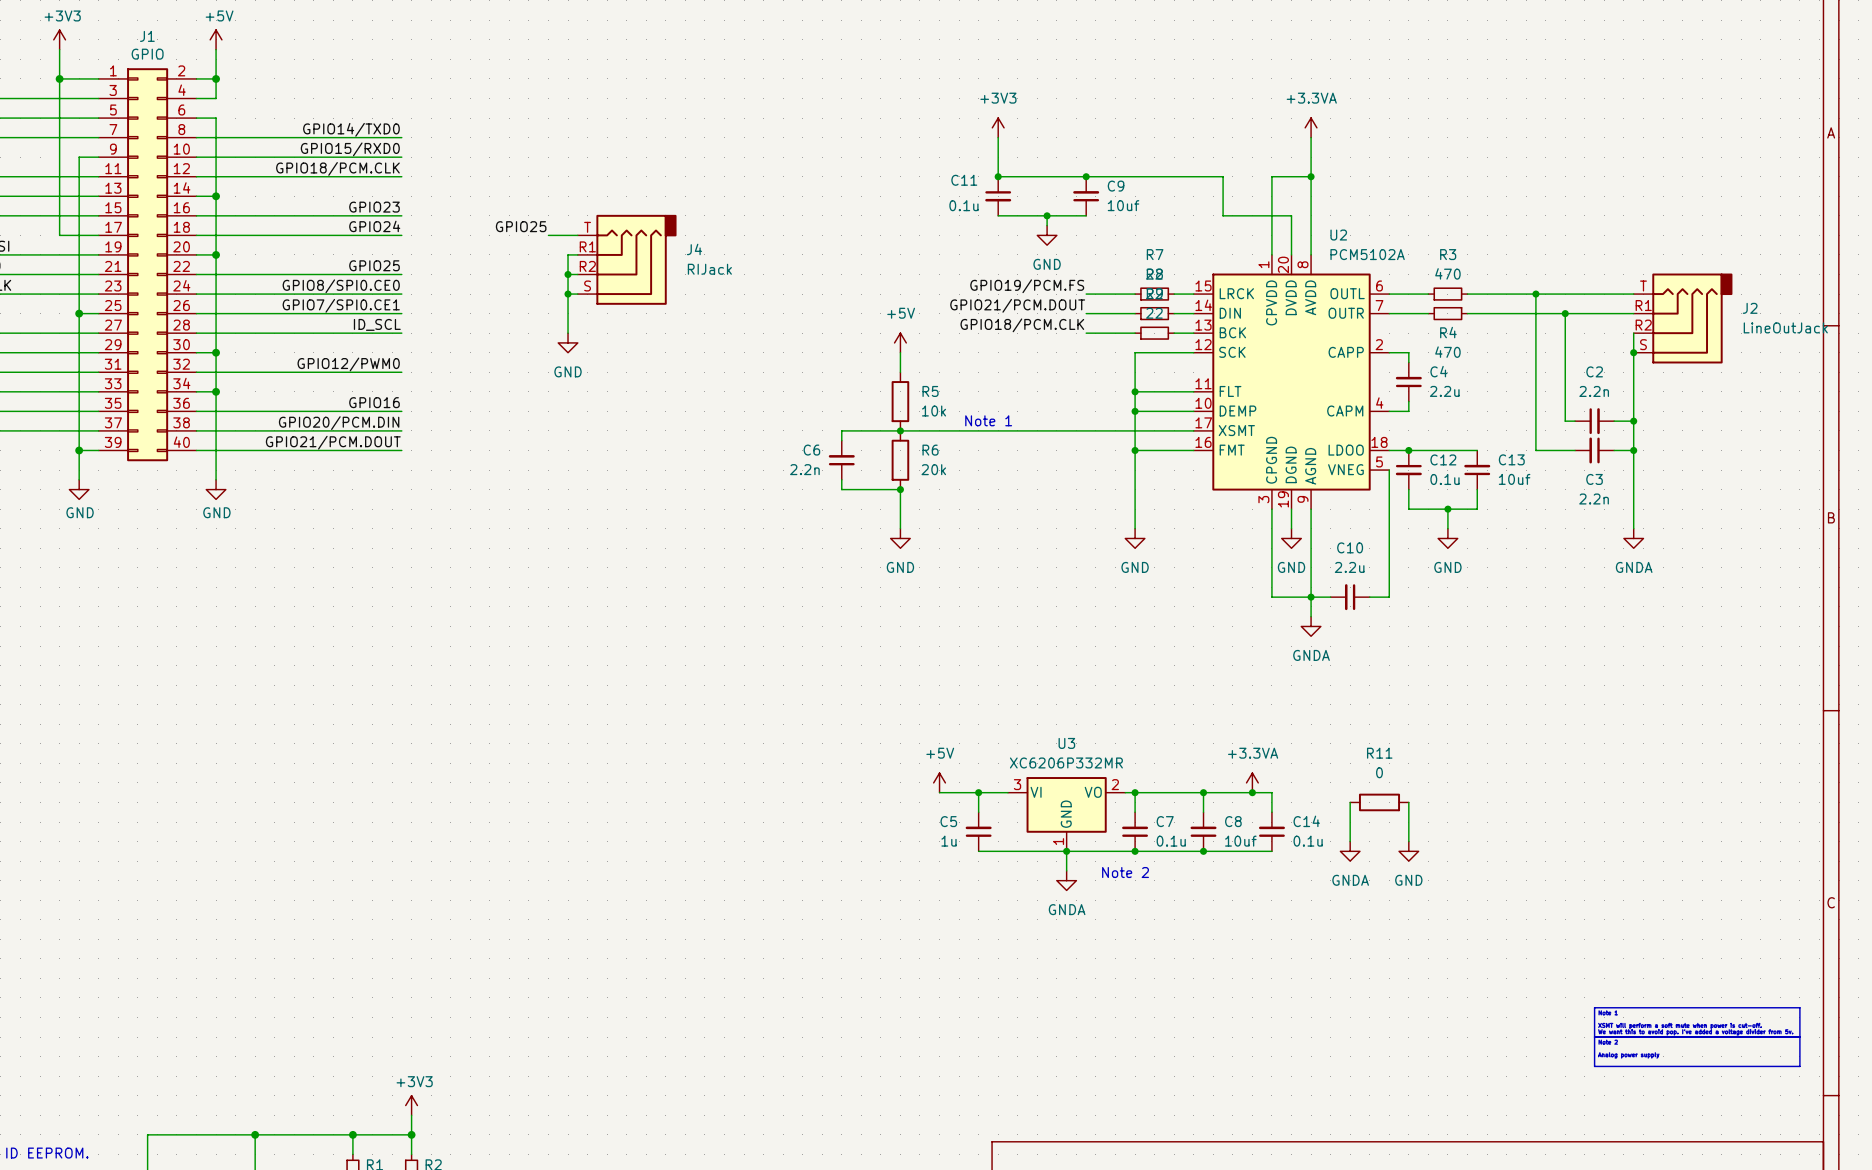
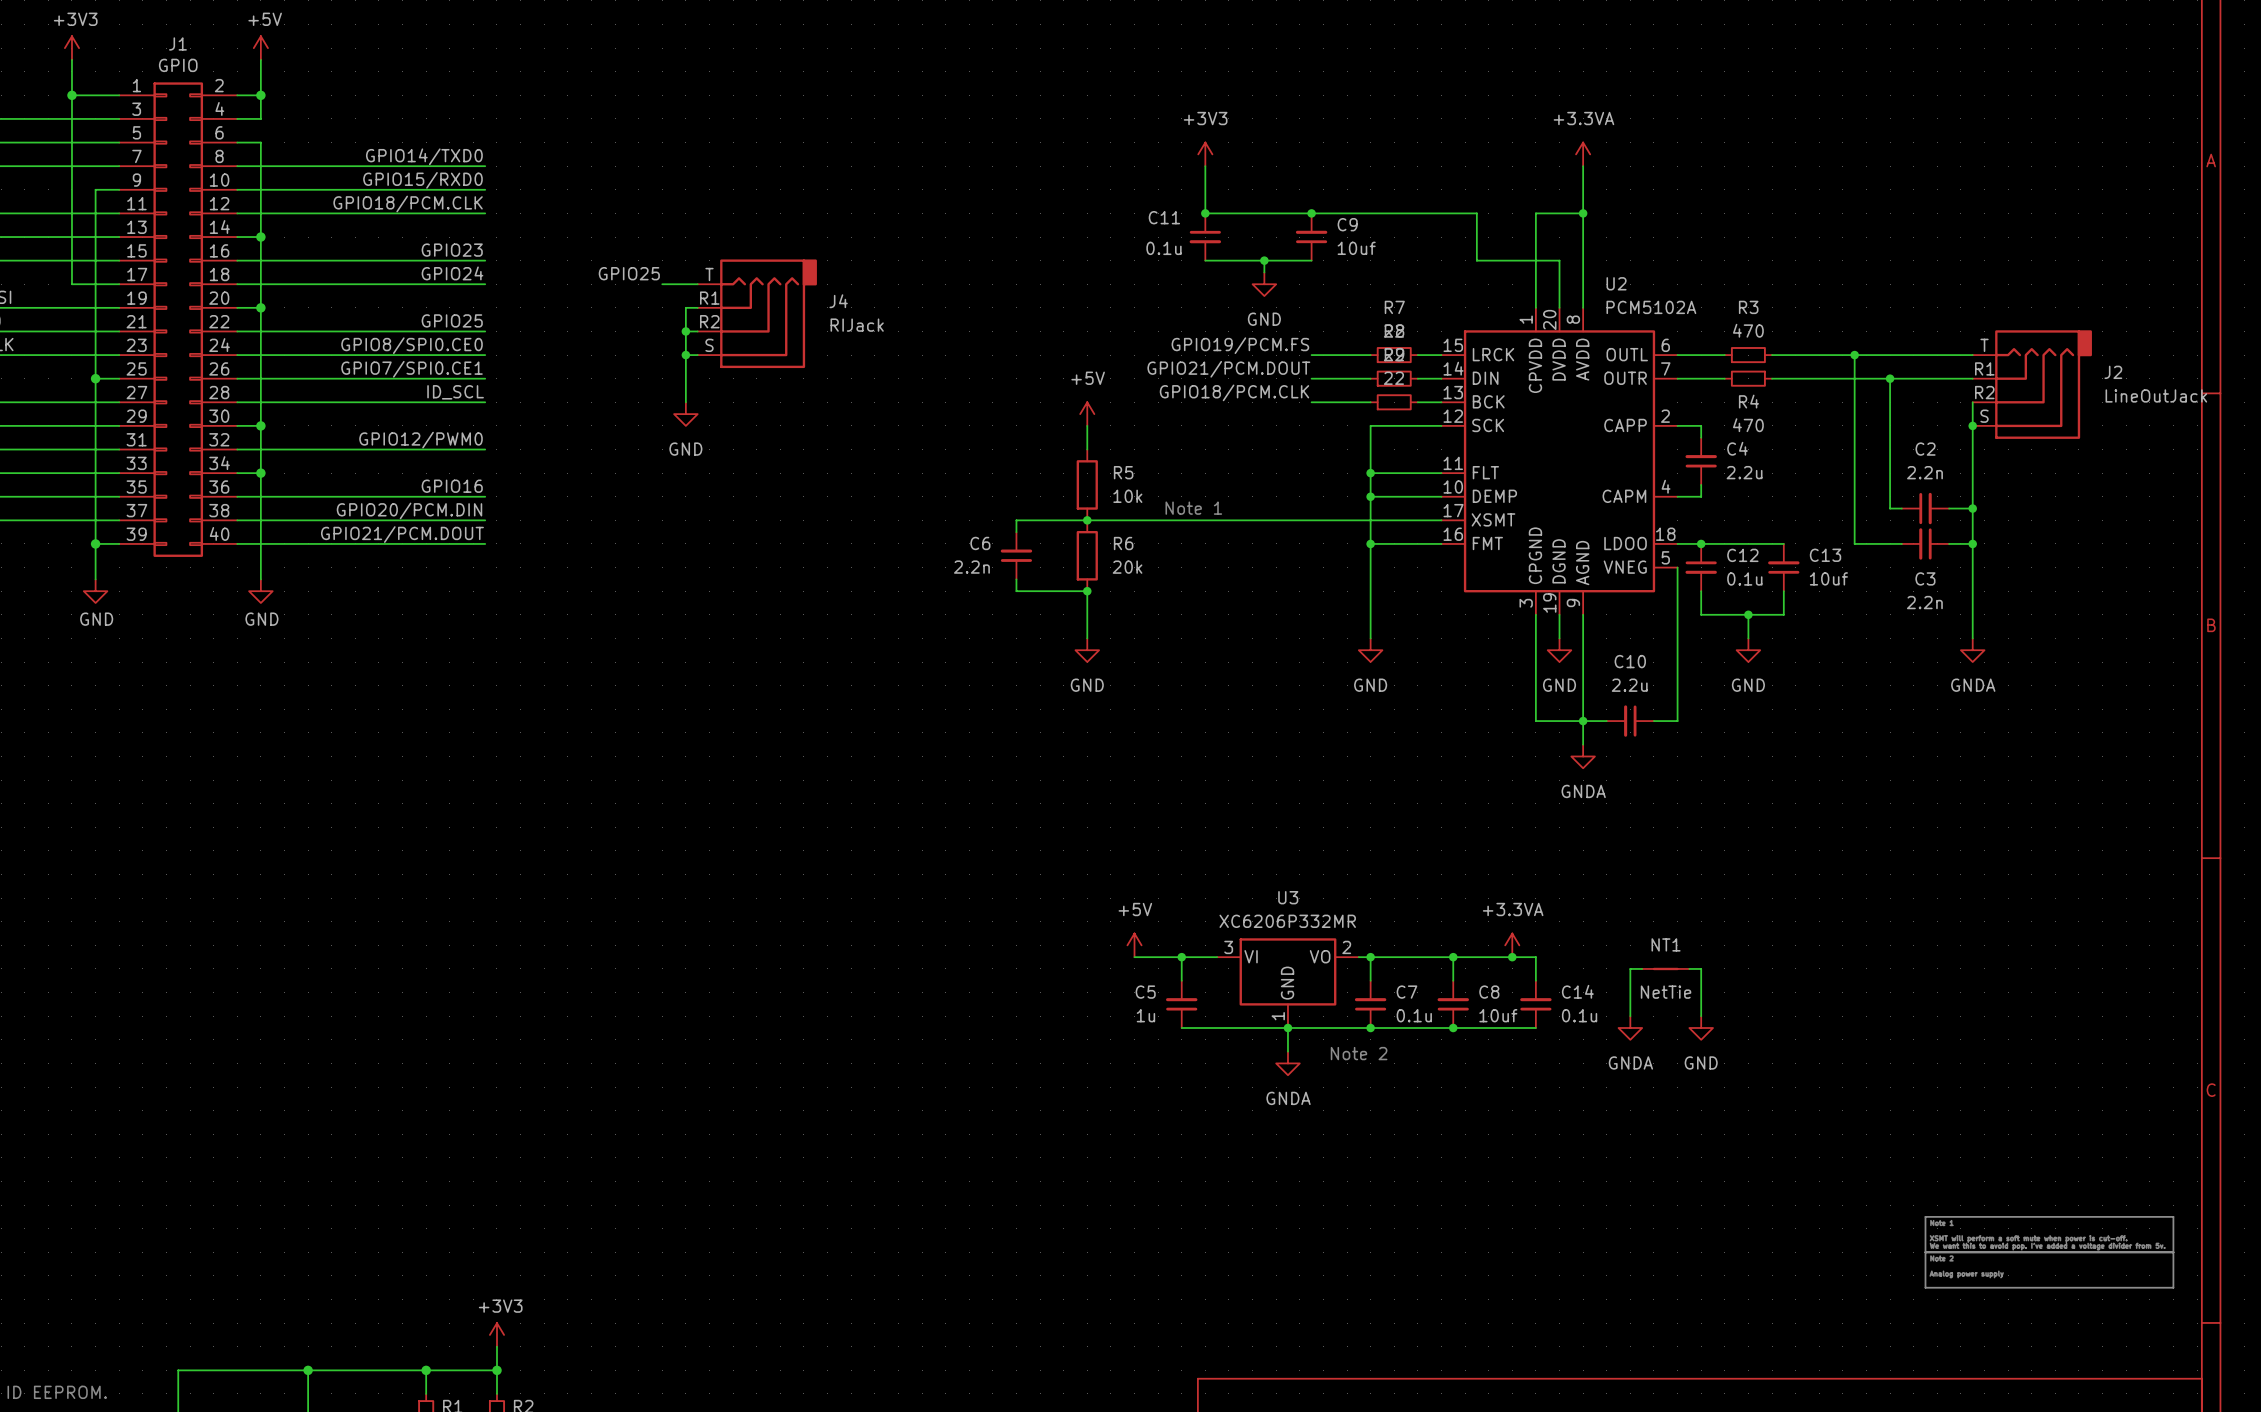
R11: 0 (1379, 802) -> none
NT1: none -> NetTie (1665, 968)

